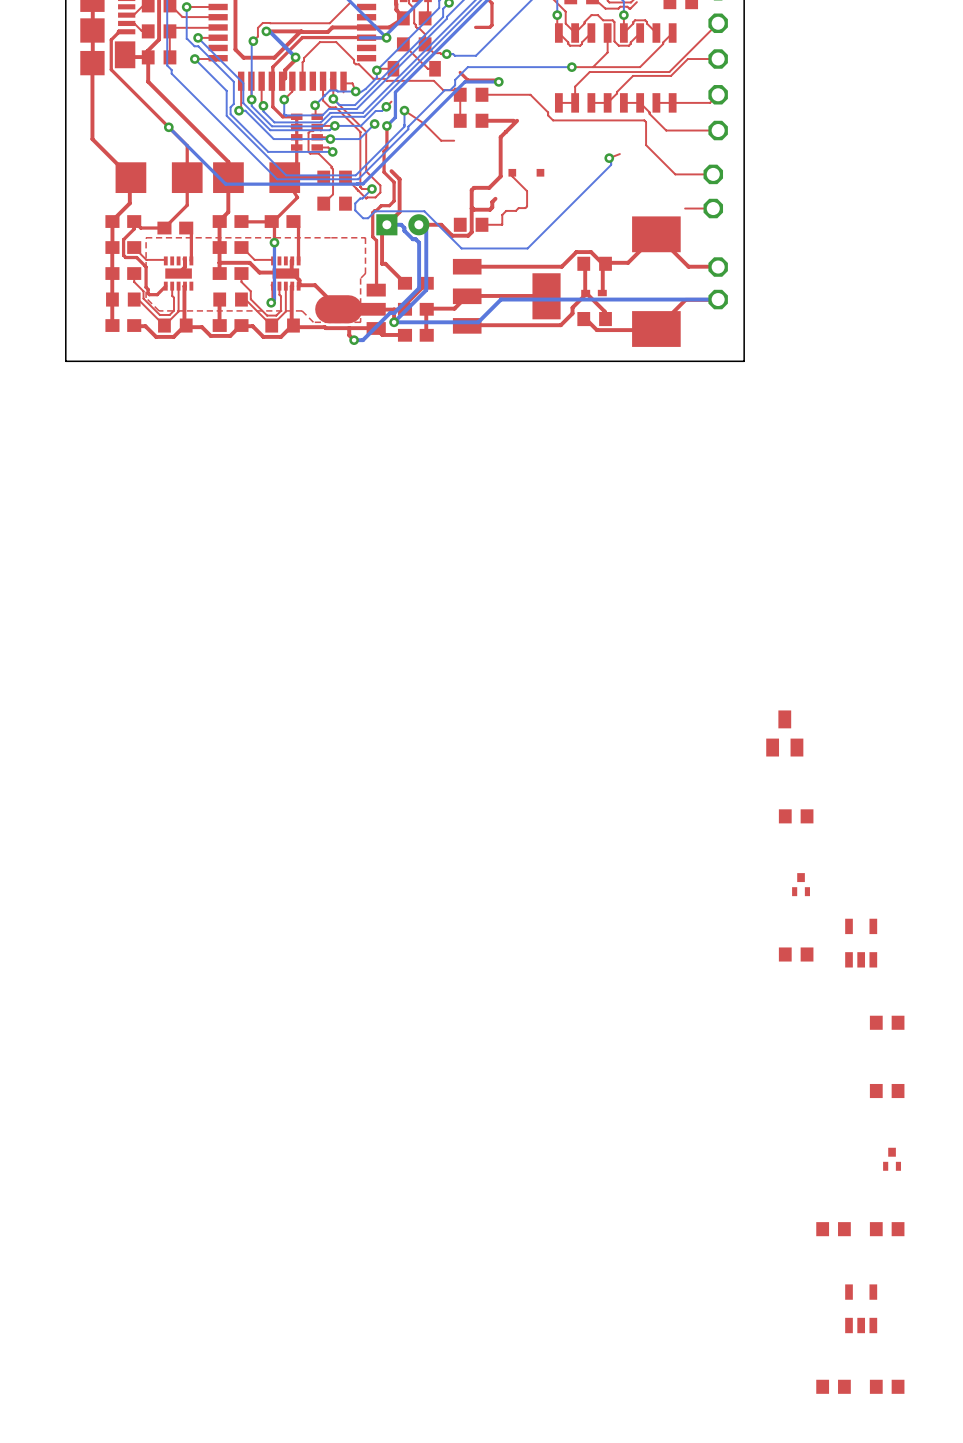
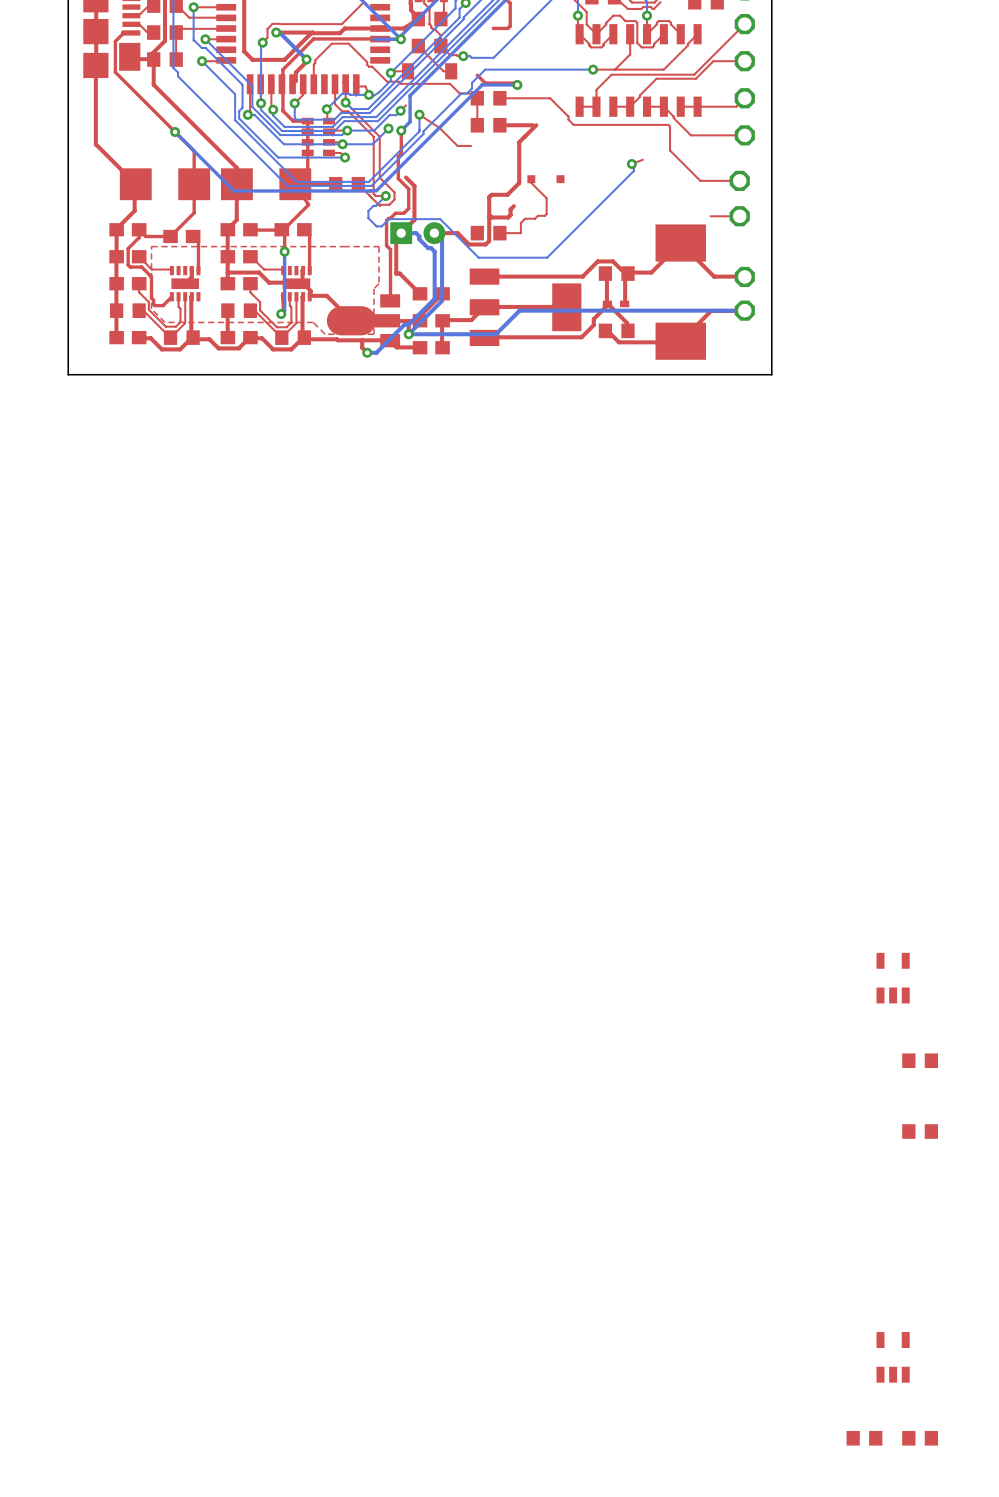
top track: (318, 125) (308, 132) (308, 151) (318, 153) (333, 169) (333, 194) (323, 203) -> none
part: (334, 203) -> none
part: (784, 733) -> none
part: (796, 816) -> none
part: (801, 884) -> none
part: (796, 954) -> none
part: (892, 1159) -> none
part: (833, 1229) -> none
part: (887, 1229) -> none

